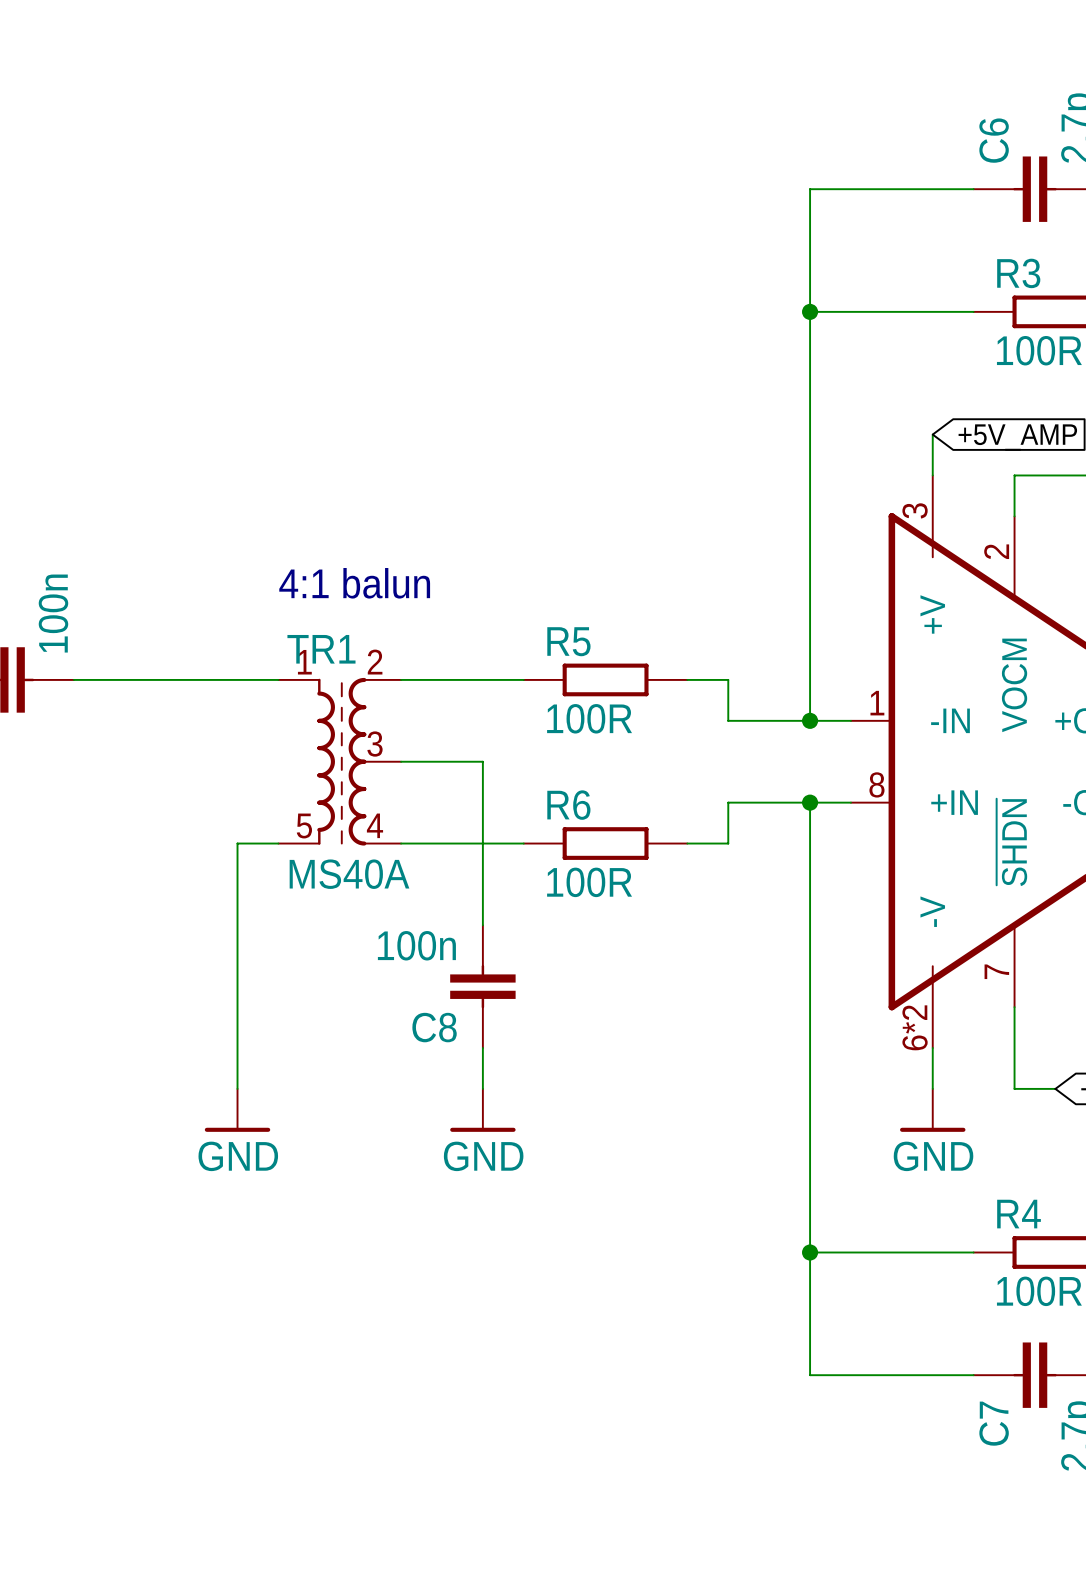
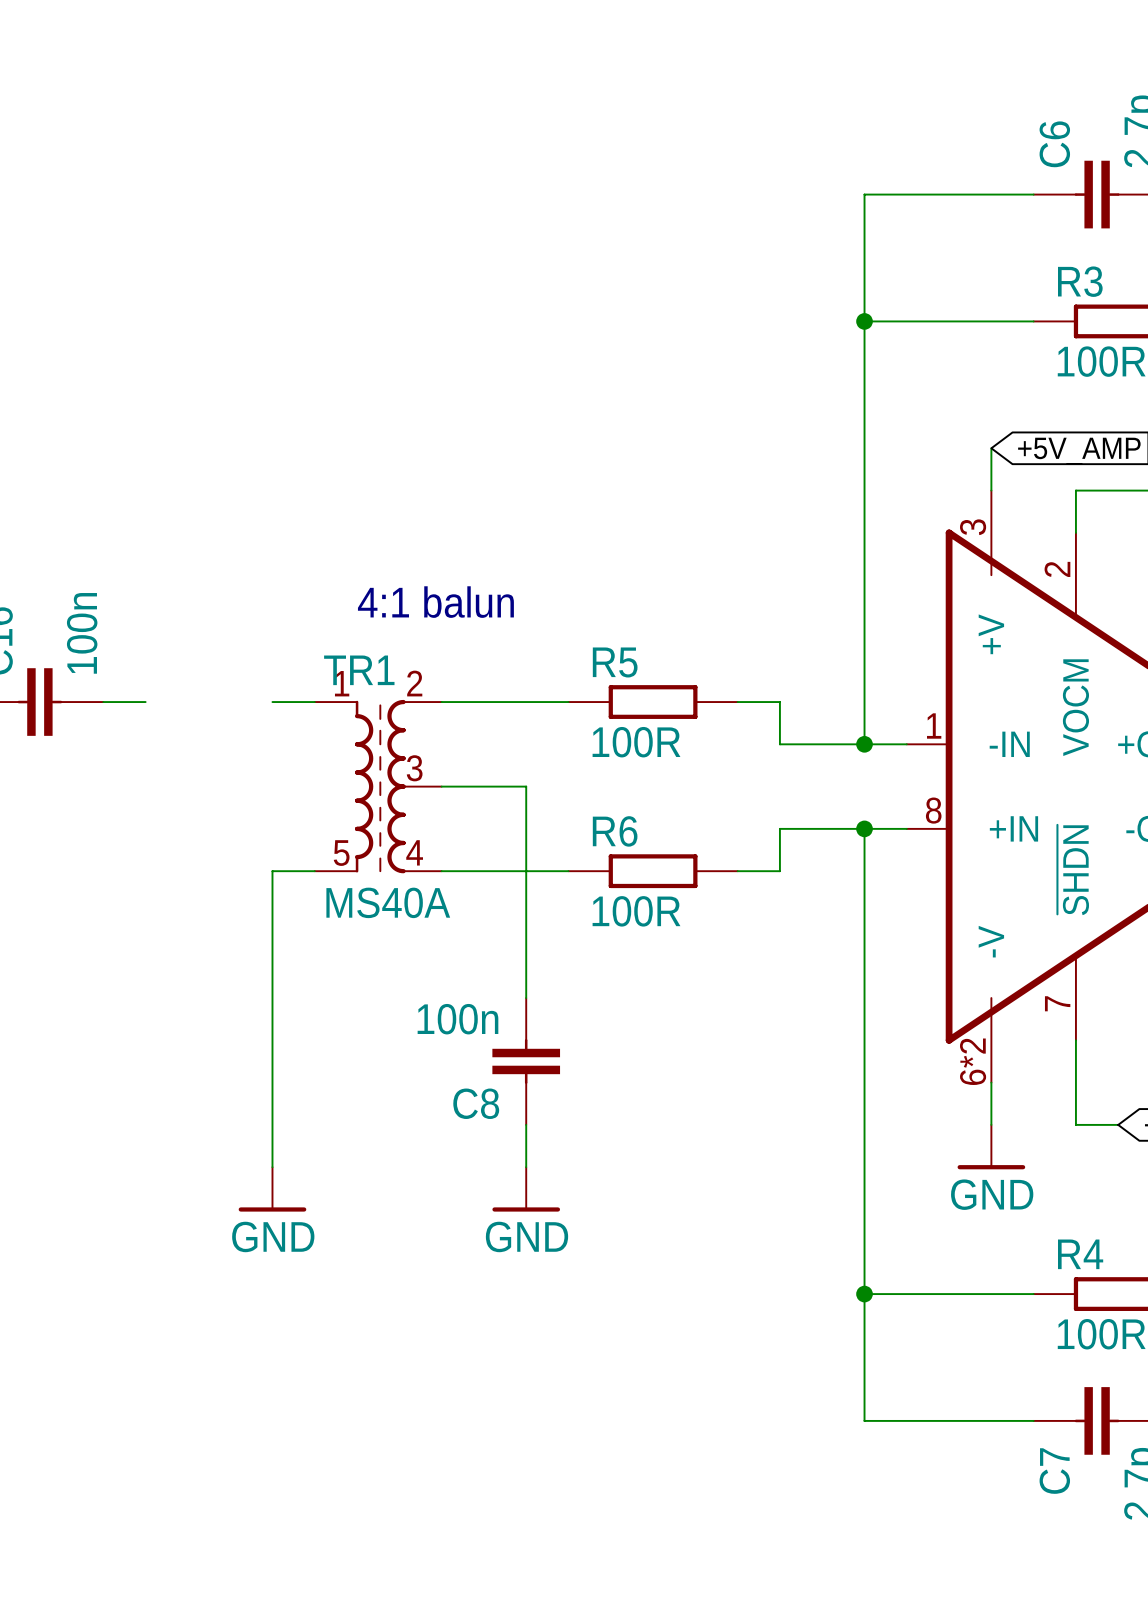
text position: 4:1 balun (354, 583) -> 4:1 balun (435, 602)
wire: (114, 679) (237, 679) -> none
C8 position: (482, 986) -> (526, 1061)
power symbol position: GND (237, 1110) -> GND (272, 1189)
power symbol position: GND (482, 1110) -> GND (526, 1189)

